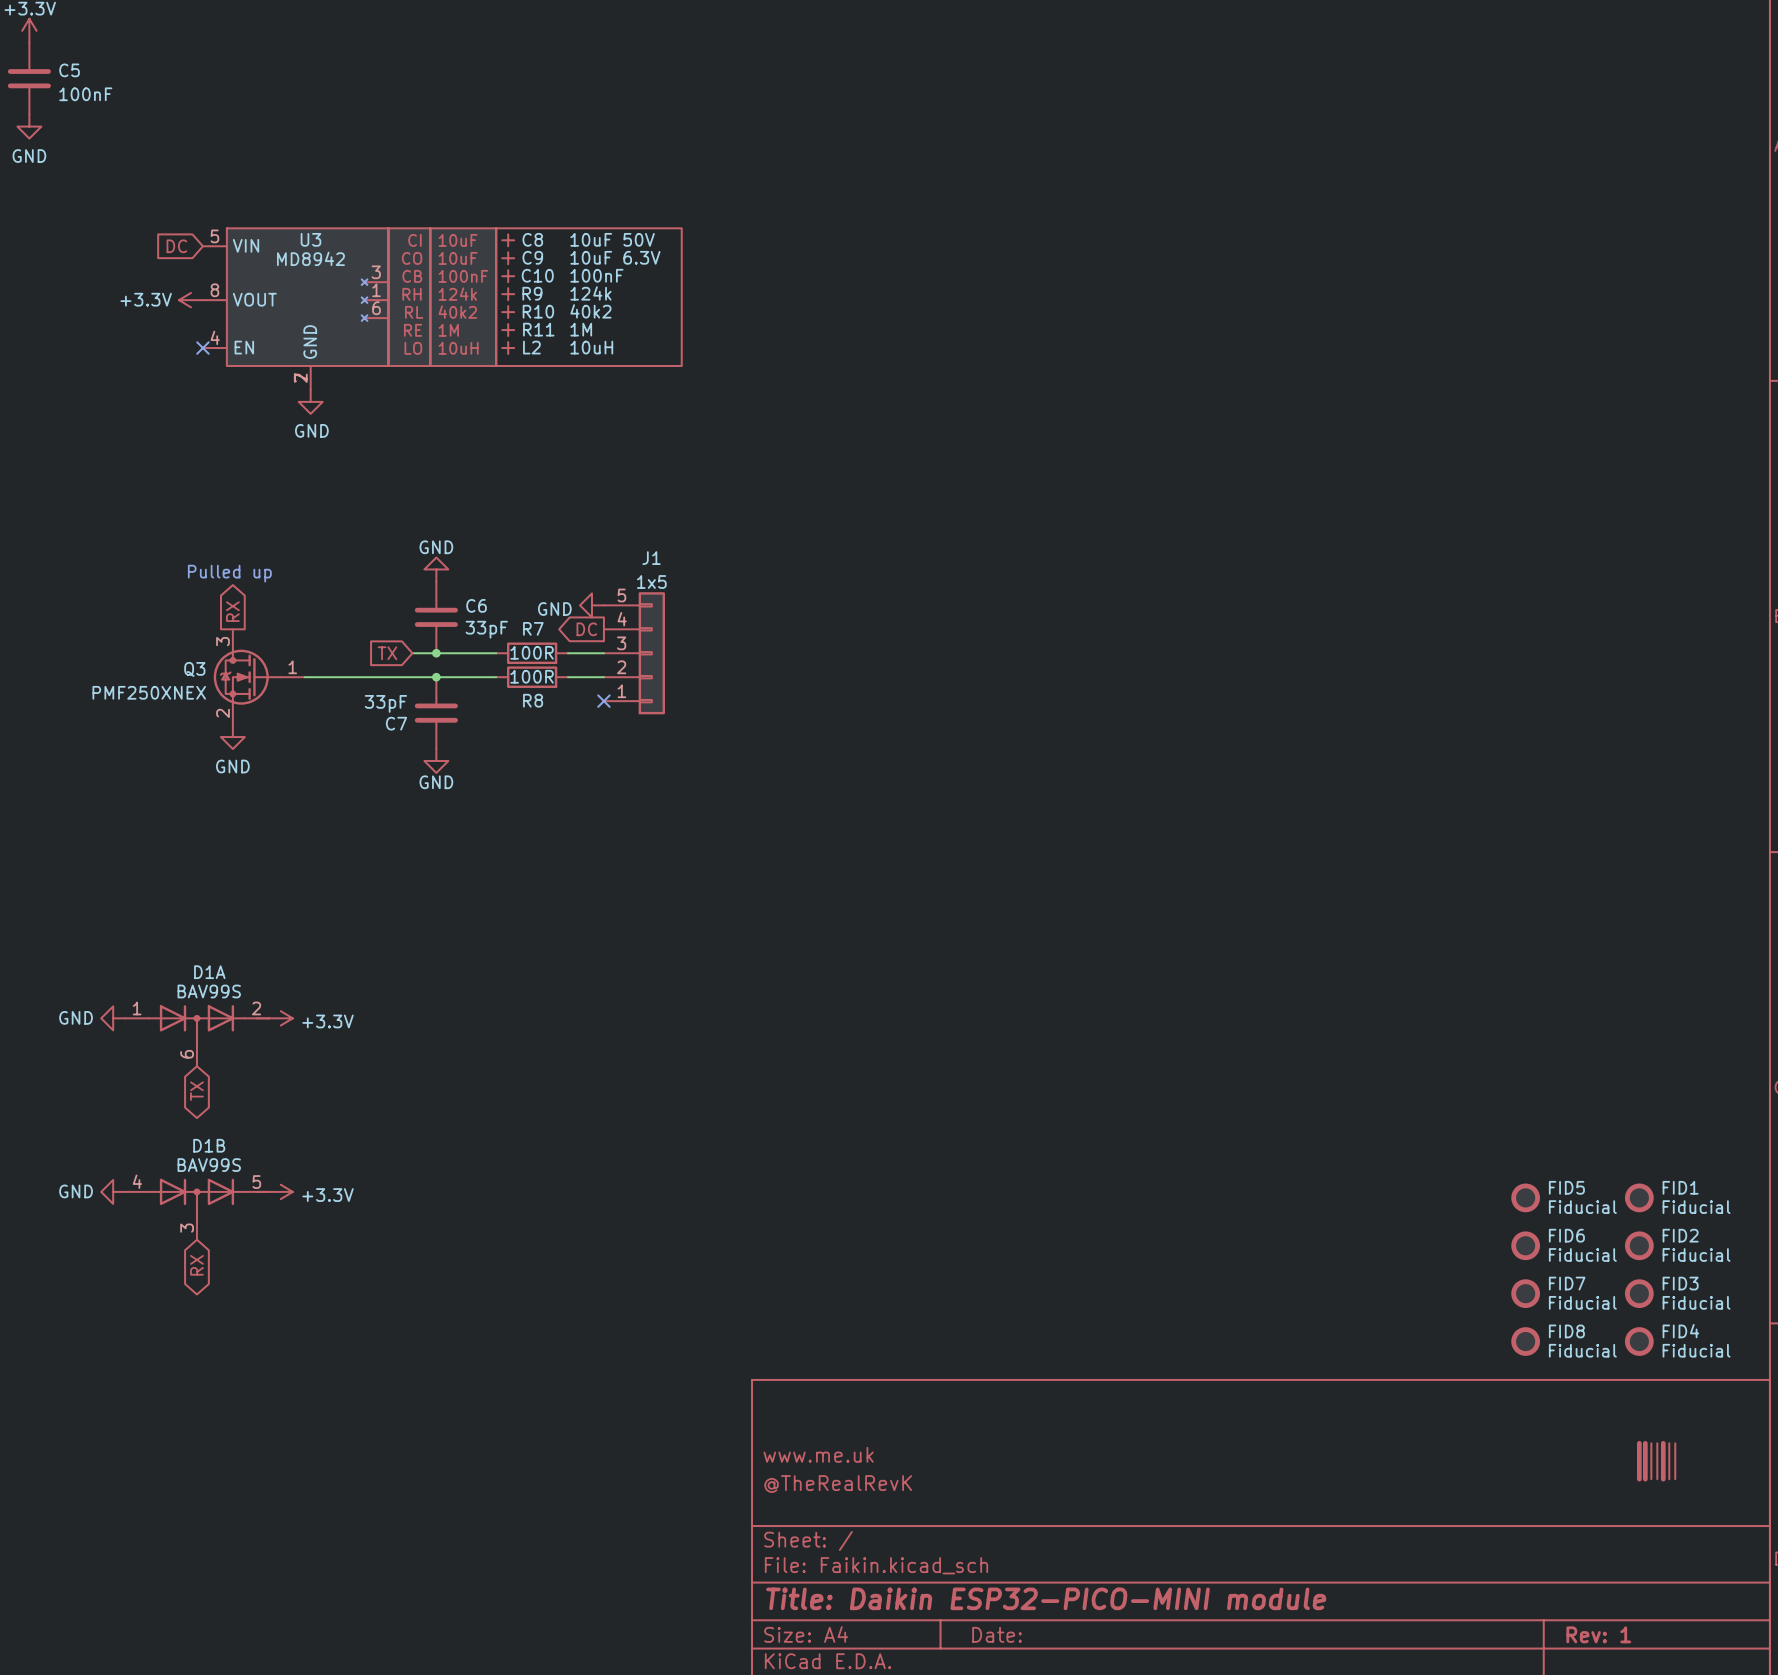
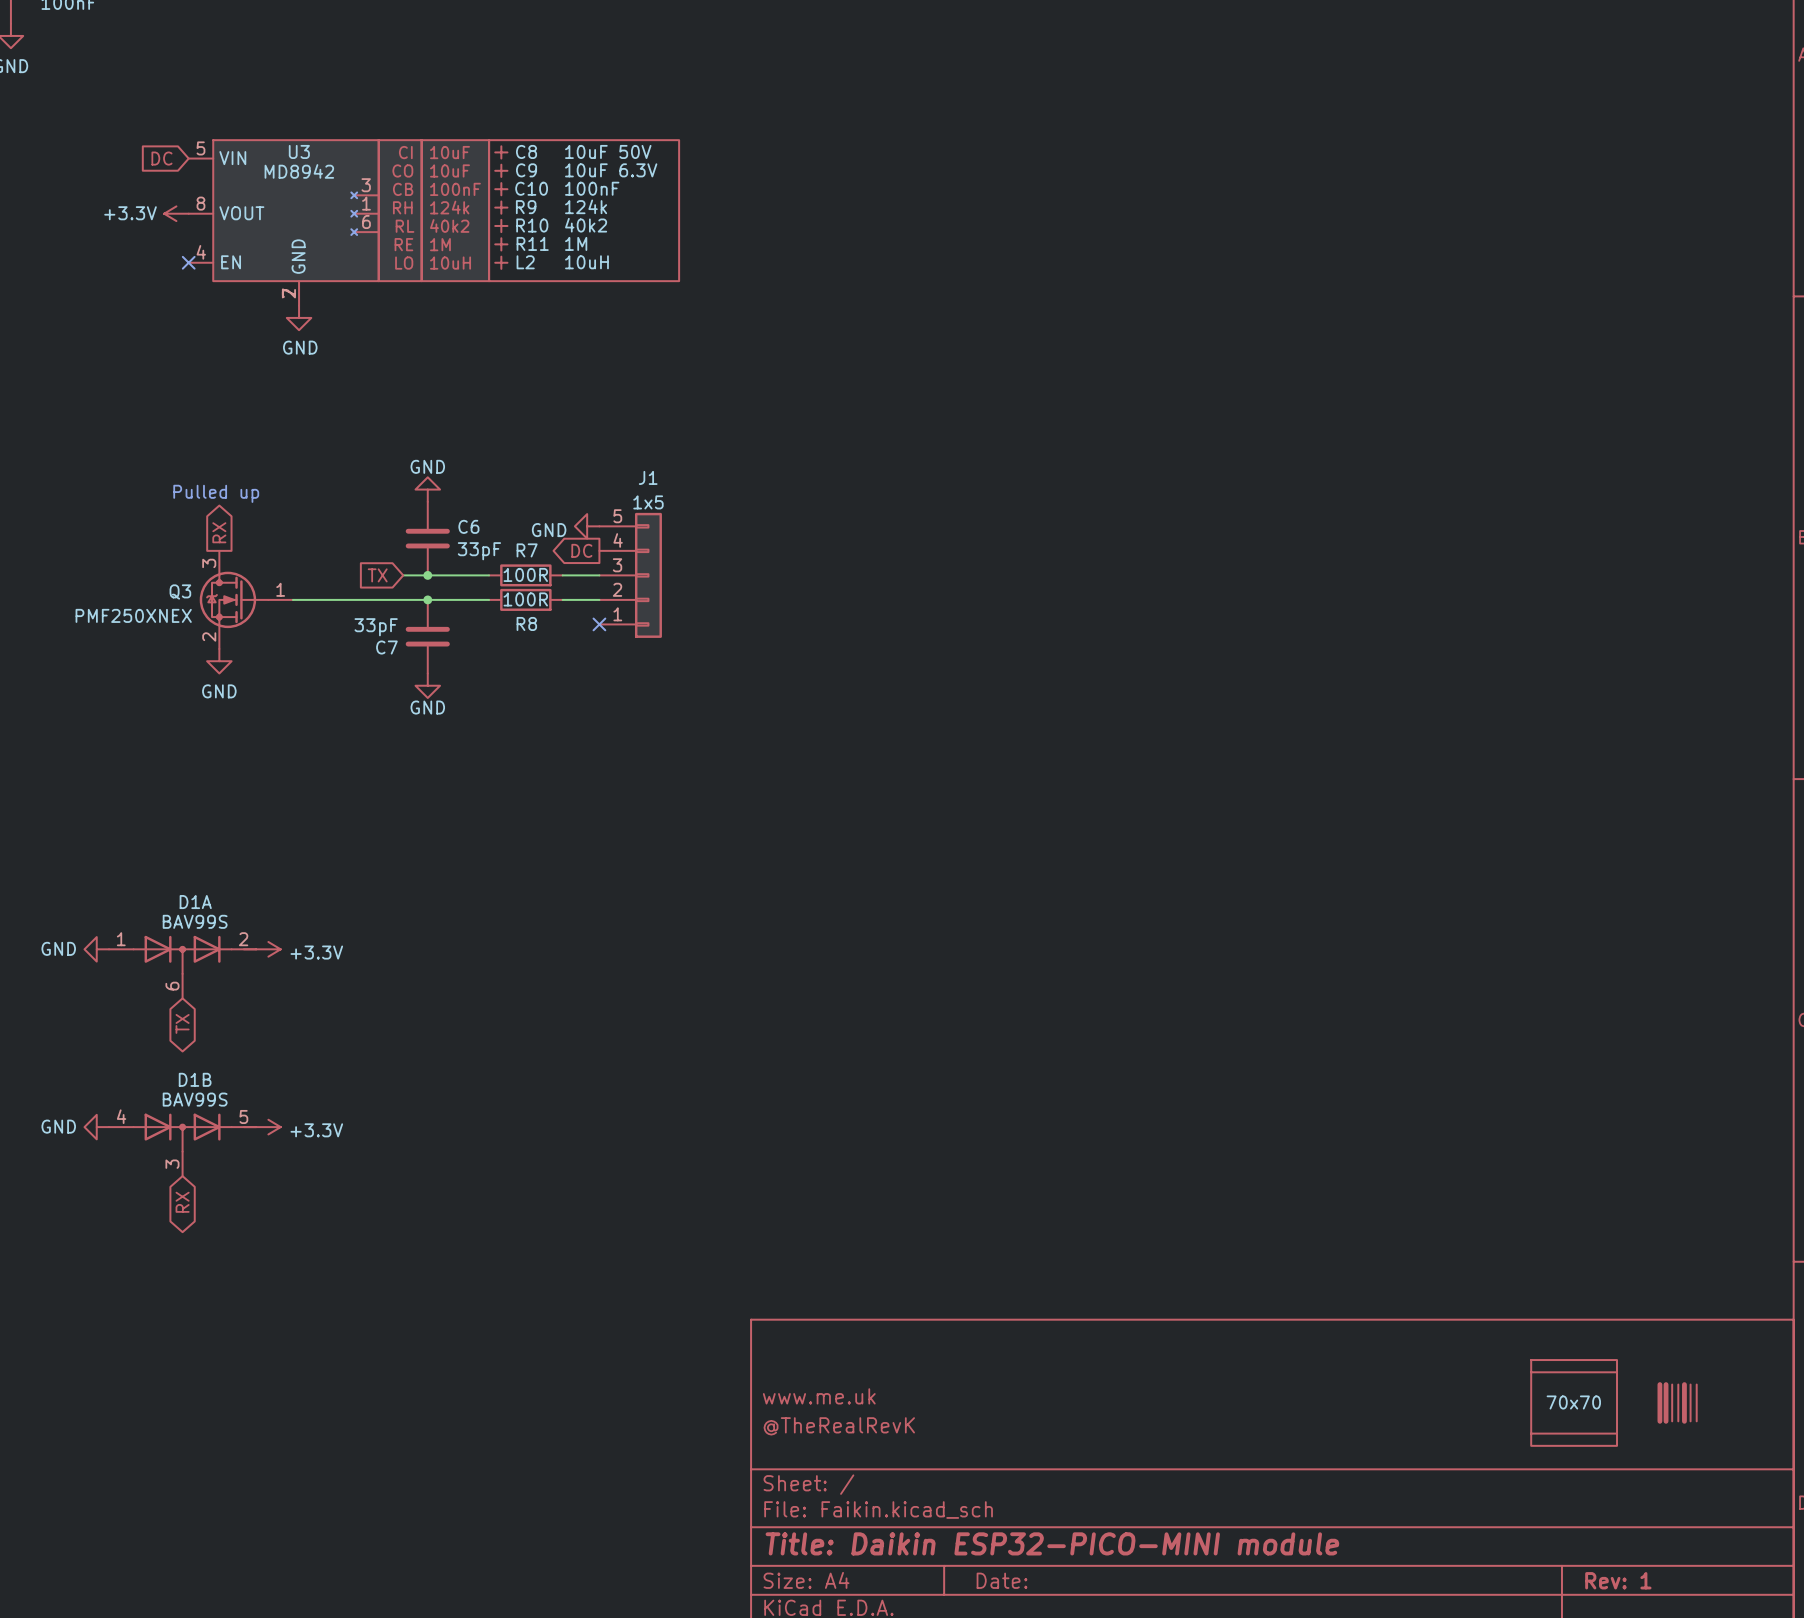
FID5: Fiducial (1525, 1197) -> none
FID1: Fiducial (1639, 1197) -> none
FID6: Fiducial (1525, 1245) -> none
FID2: Fiducial (1639, 1245) -> none
FID7: Fiducial (1525, 1293) -> none
FID3: Fiducial (1639, 1293) -> none
FID8: Fiducial (1525, 1341) -> none
FID4: Fiducial (1639, 1341) -> none
part: none -> 70x70 (1574, 1402)

